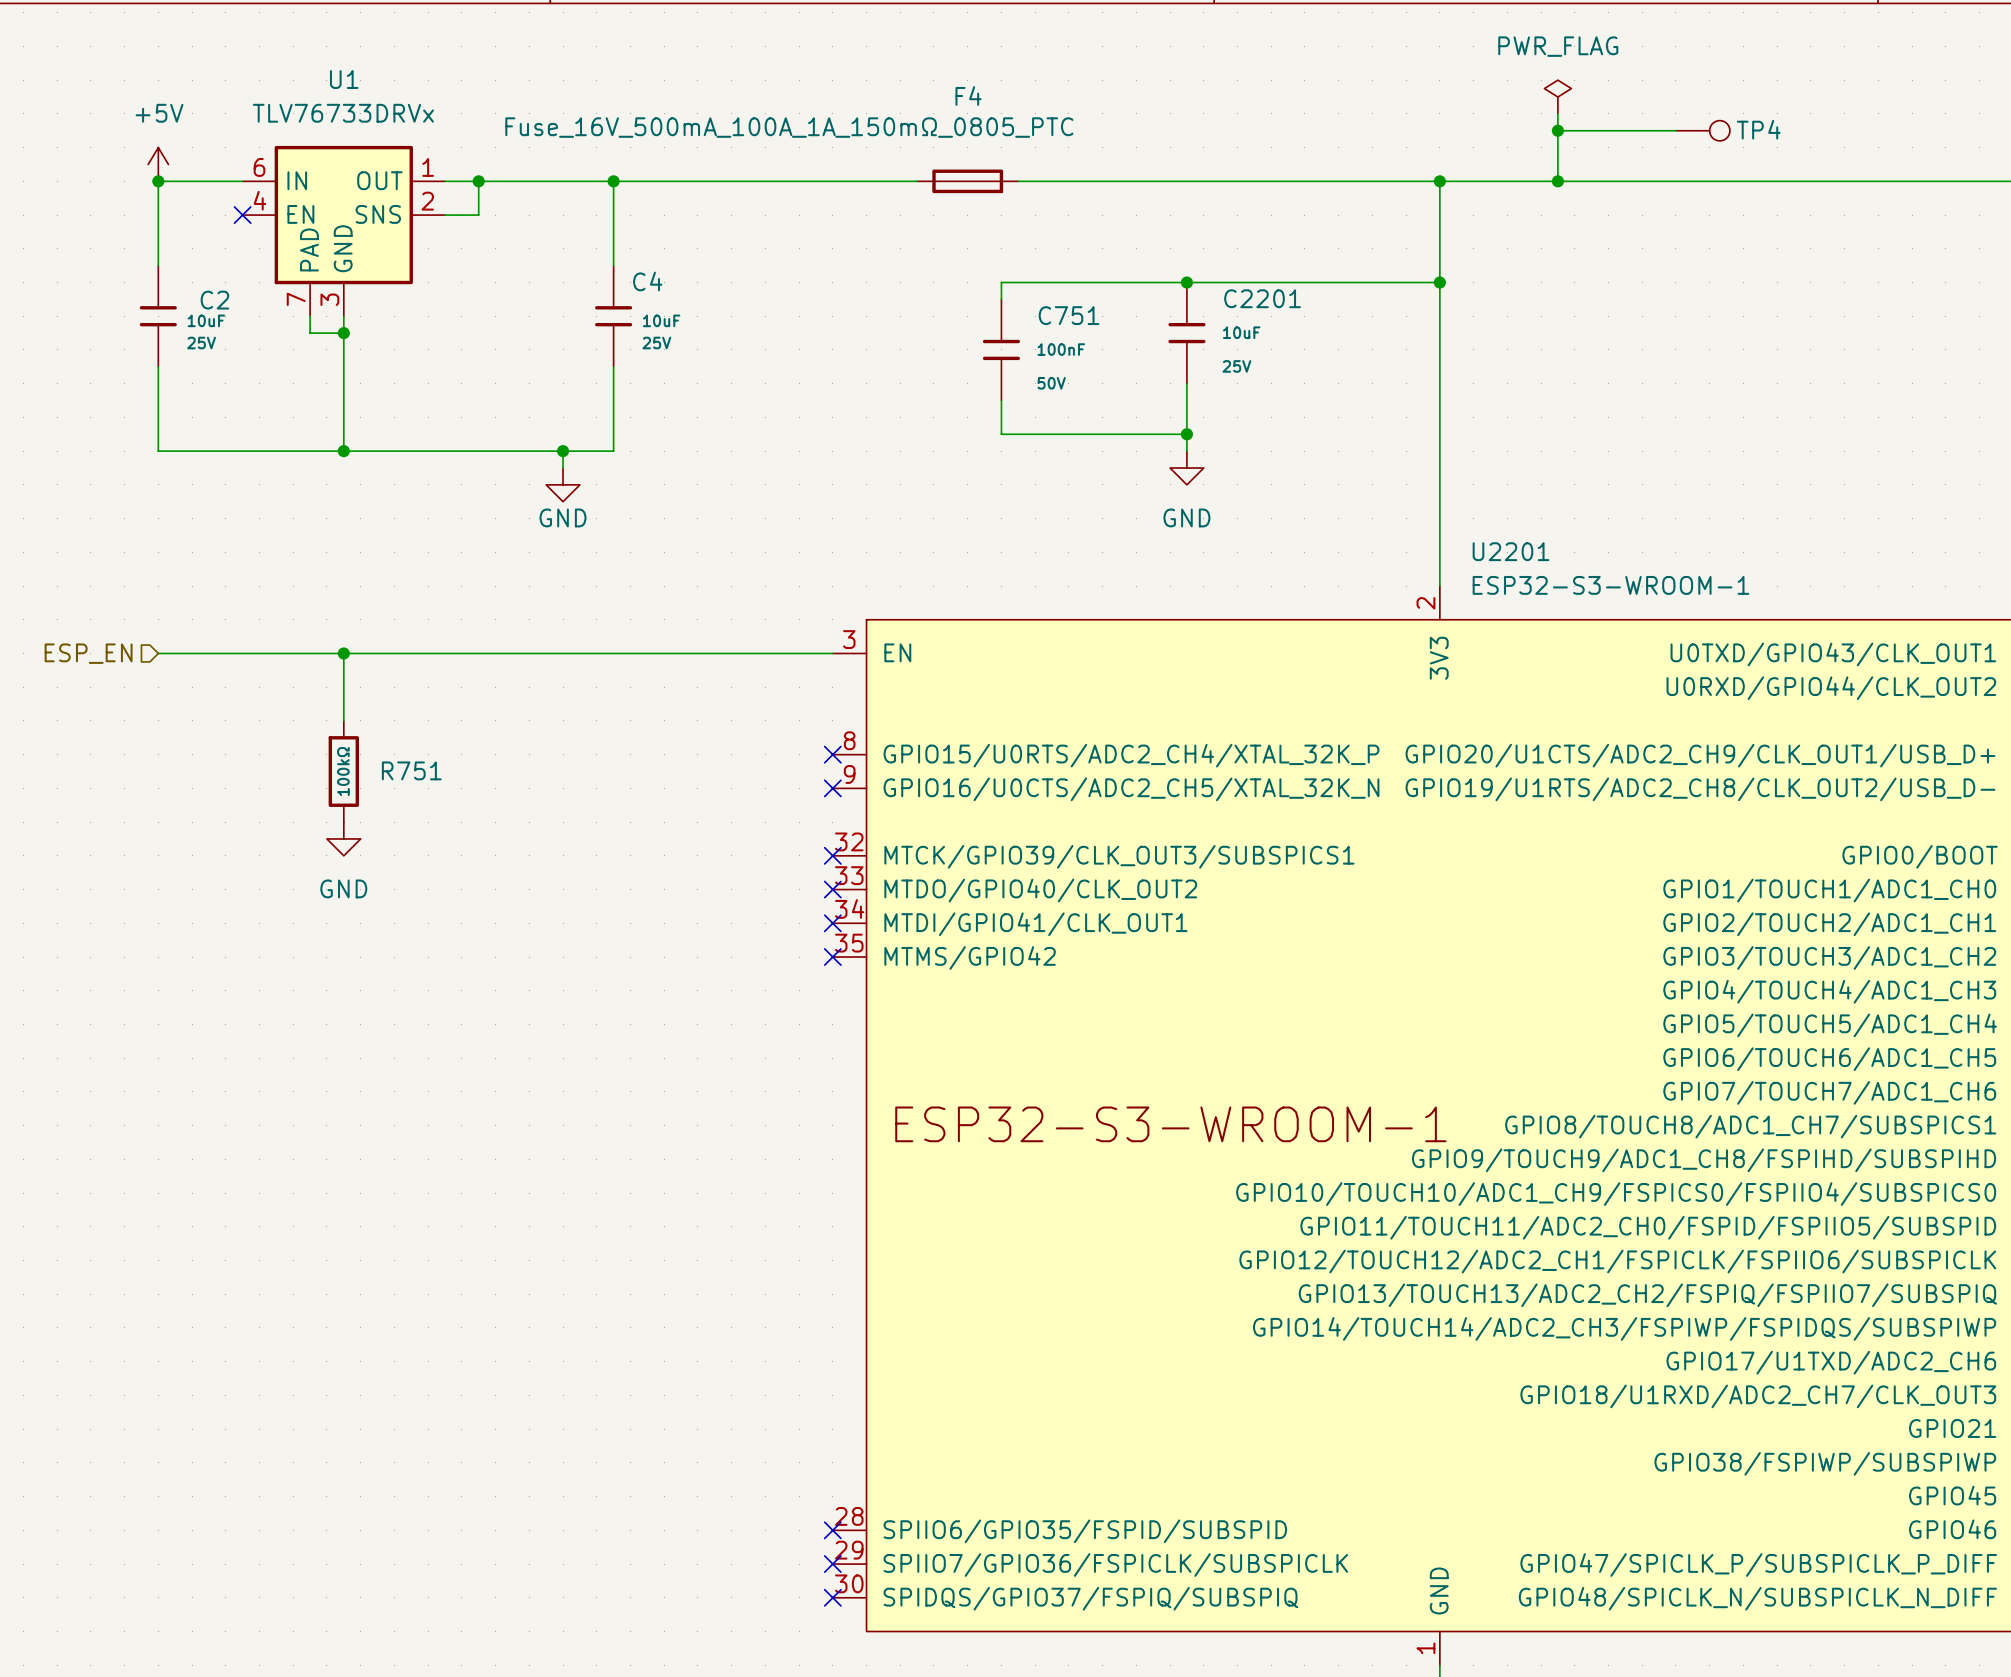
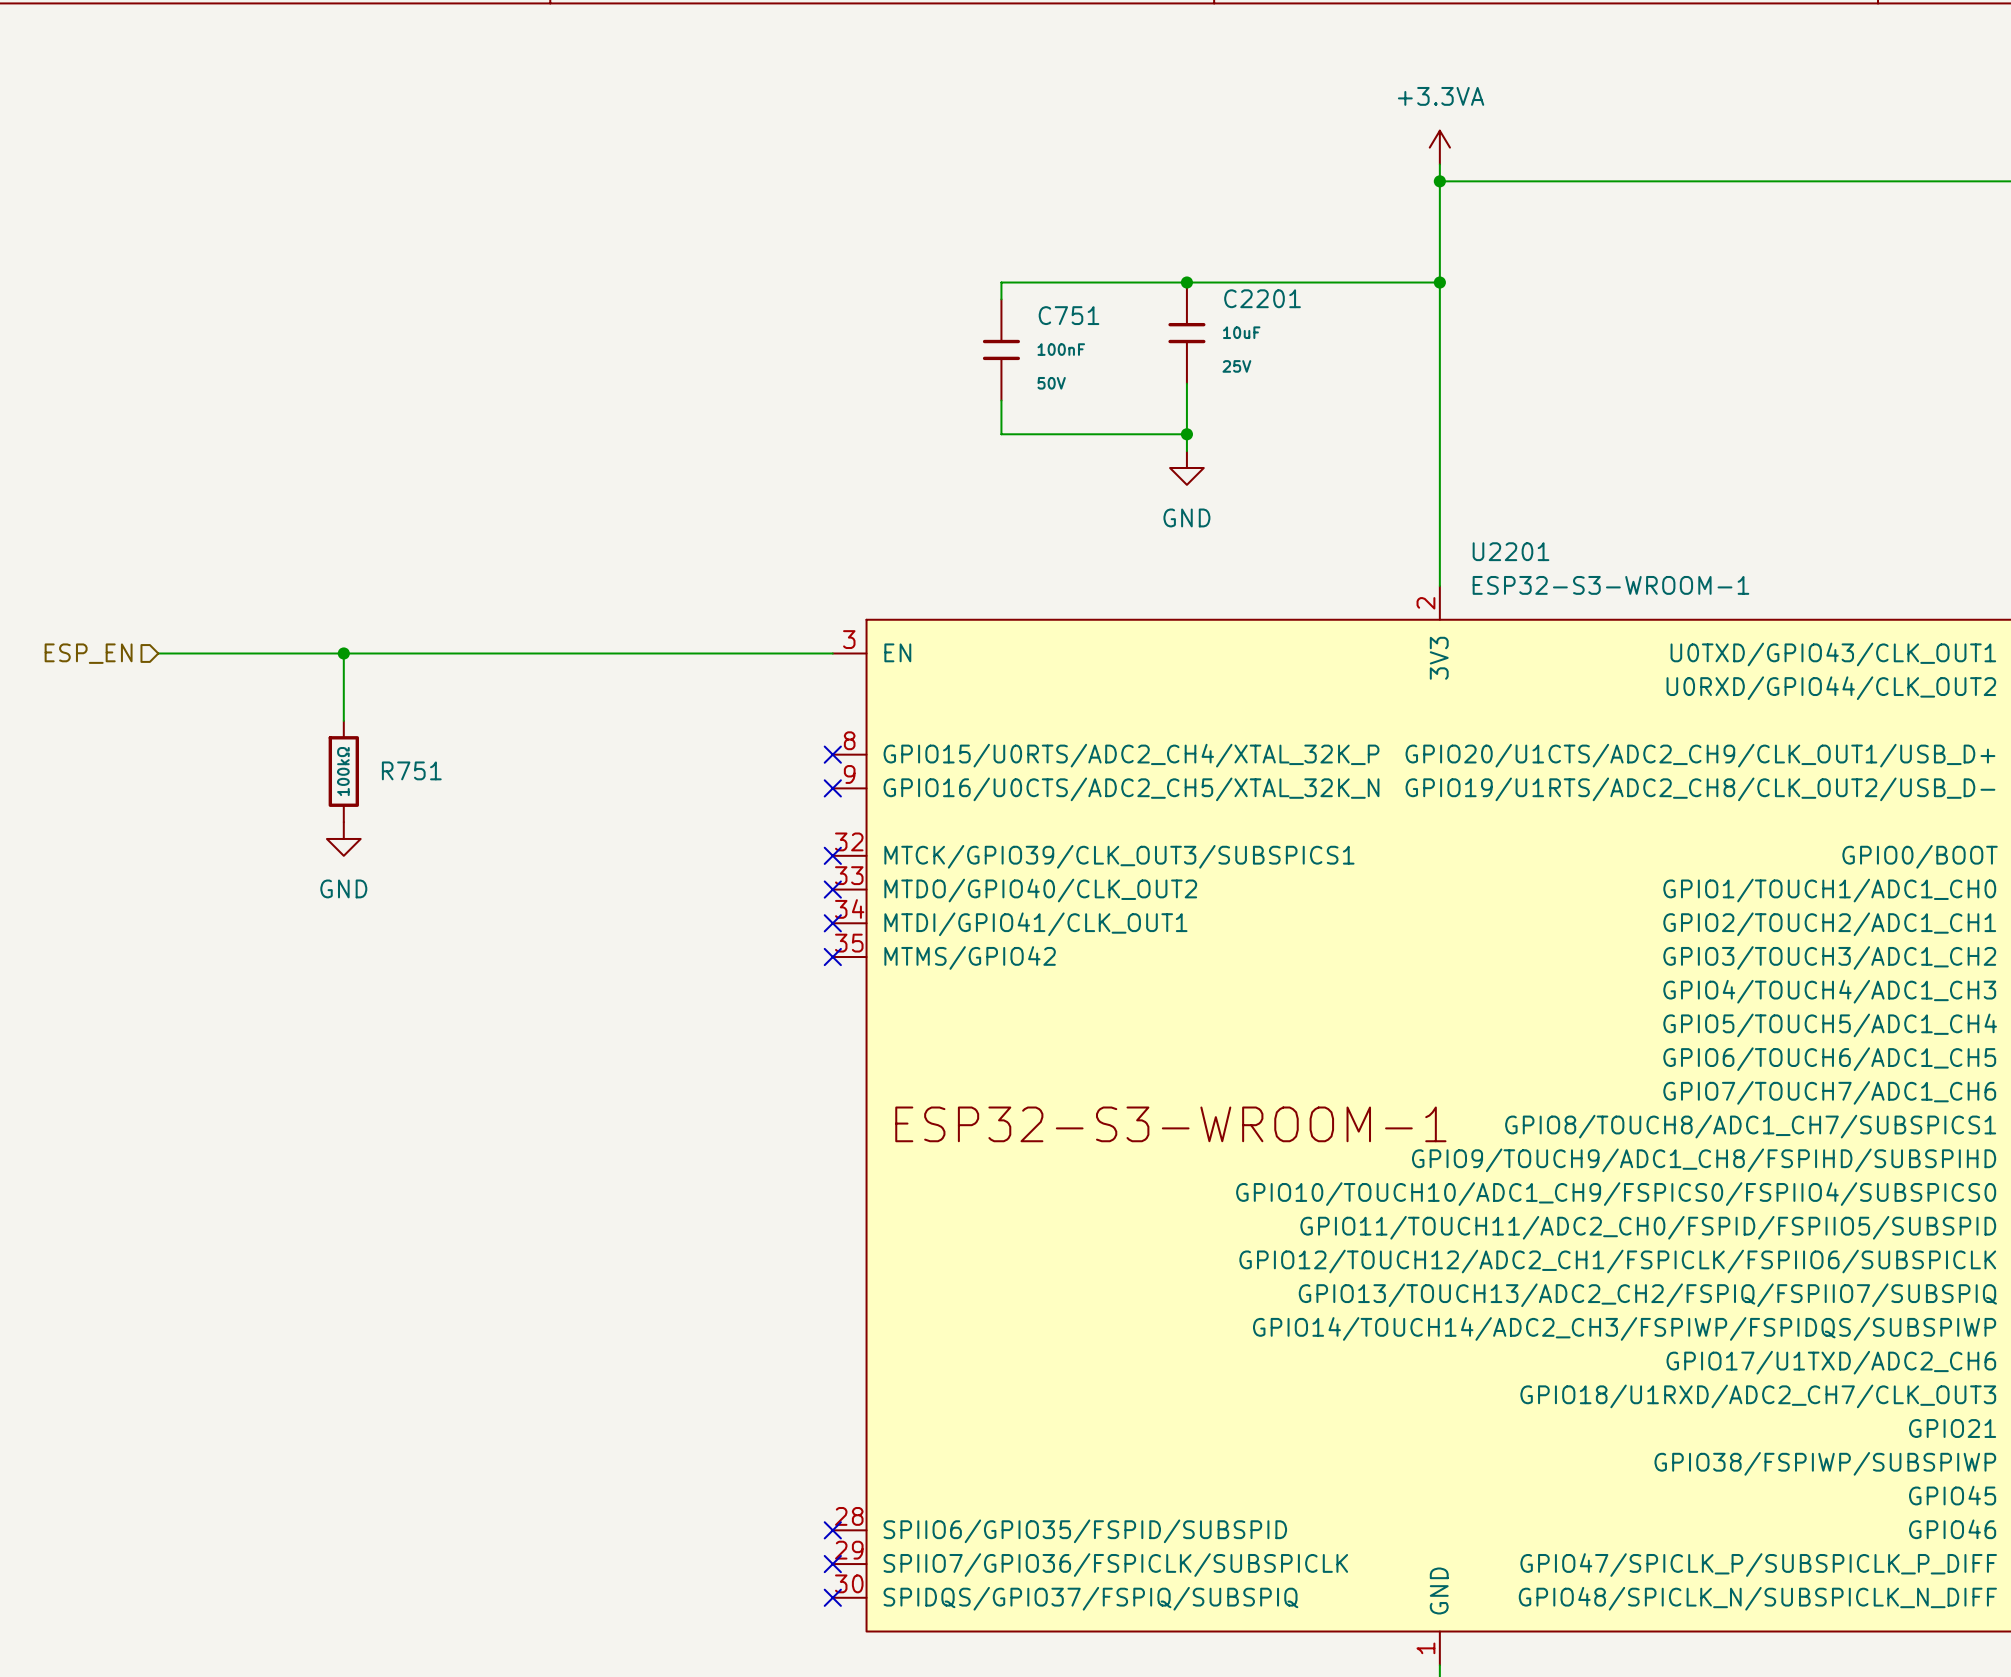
power symbol: PWR_FLAG (1557, 97) -> none
wire: (1557, 113) (1557, 181) -> none
wire: (1557, 130) (1675, 130) -> none
junction: (1557, 130) -> none
TP4: (1702, 130) -> none
power symbol: none -> +3.3VA (1439, 147)
power symbol: +5V (158, 164) -> none
junction: (158, 181) -> none
wire: (242, 181) (158, 181) (158, 265) -> none
wire: (444, 181) (917, 181) -> none
wire: (478, 181) (478, 215) (444, 215) -> none
junction: (478, 181) -> none
wire: (613, 181) (613, 265) -> none
junction: (613, 181) -> none
F4: Fuse_16V_500mA_100A_1A_150mΩ_0805_PTC (967, 181) -> none
wire: (1018, 181) (1439, 181) -> (1439, 164) (1439, 181)
junction: (1557, 181) -> none
no-connect mark: (242, 215) -> none
U1: TLV76733DRVx (343, 231) -> none
C2: 10uF (158, 316) -> none
wire: (310, 316) (310, 333) (343, 333) -> none
wire: (343, 316) (343, 451) -> none
C4: 10uF (613, 316) -> none
junction: (343, 333) -> none
wire: (158, 366) (158, 451) (613, 451) (613, 366) -> none
junction: (343, 451) -> none
wire: (563, 451) (563, 468) -> none
junction: (563, 451) -> none
power symbol: GND (563, 484) -> none

